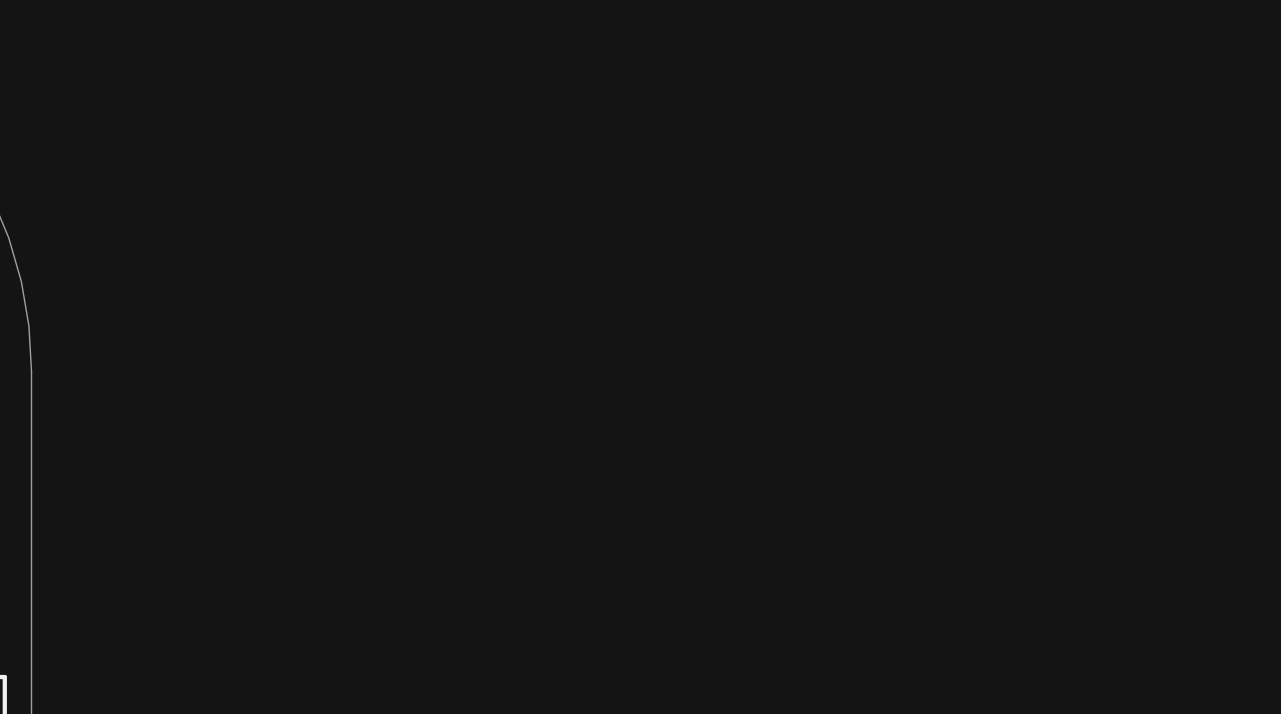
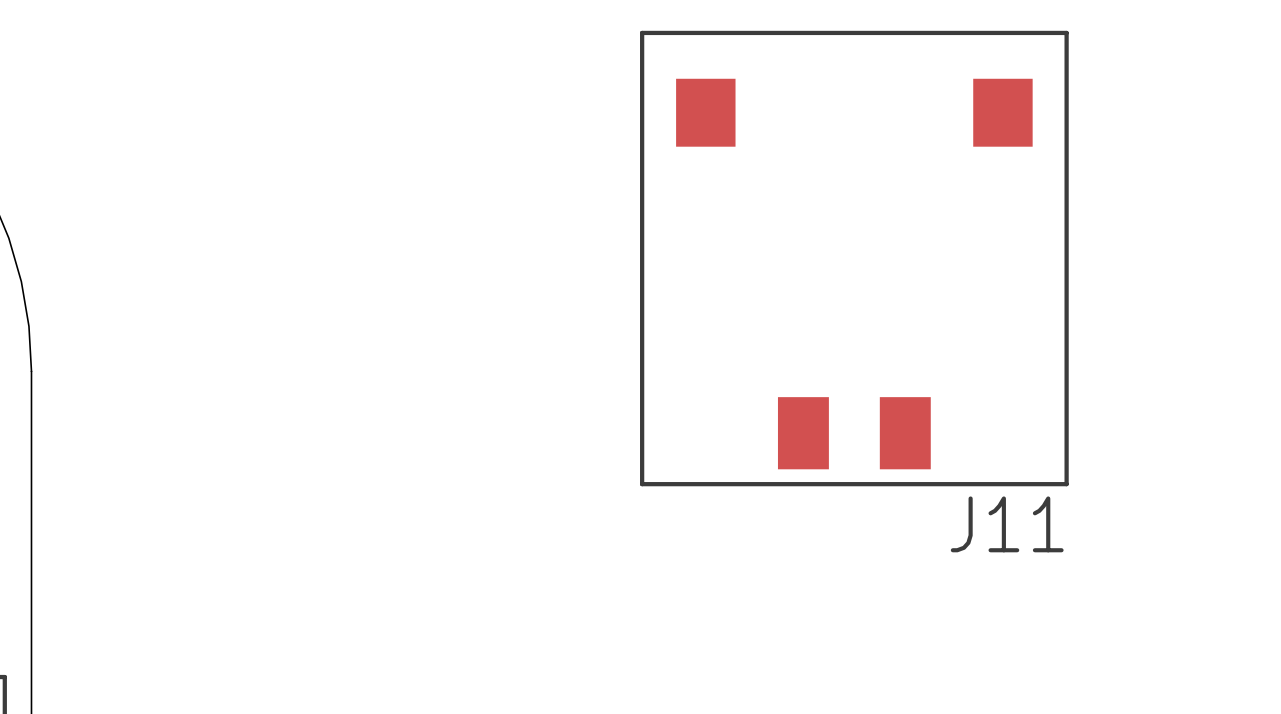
J11: none -> (854, 258)

